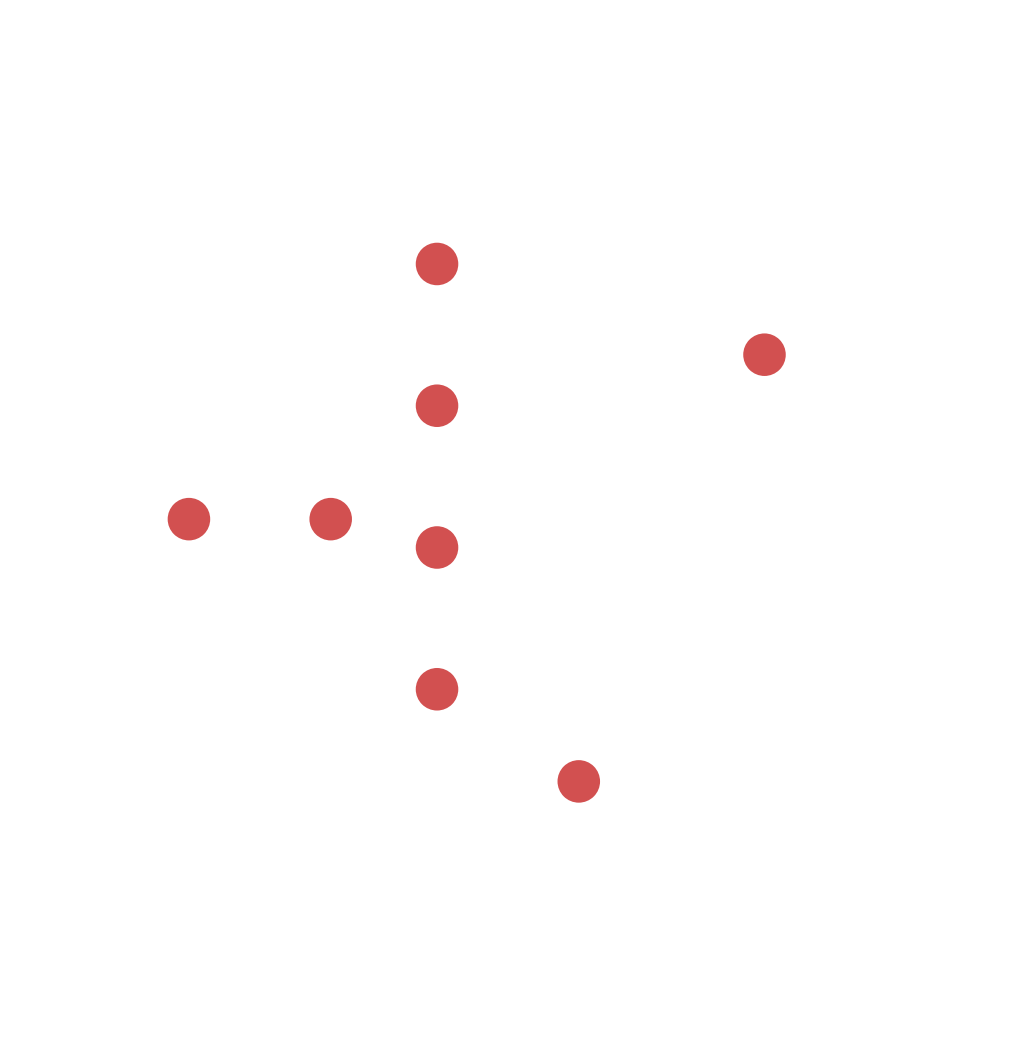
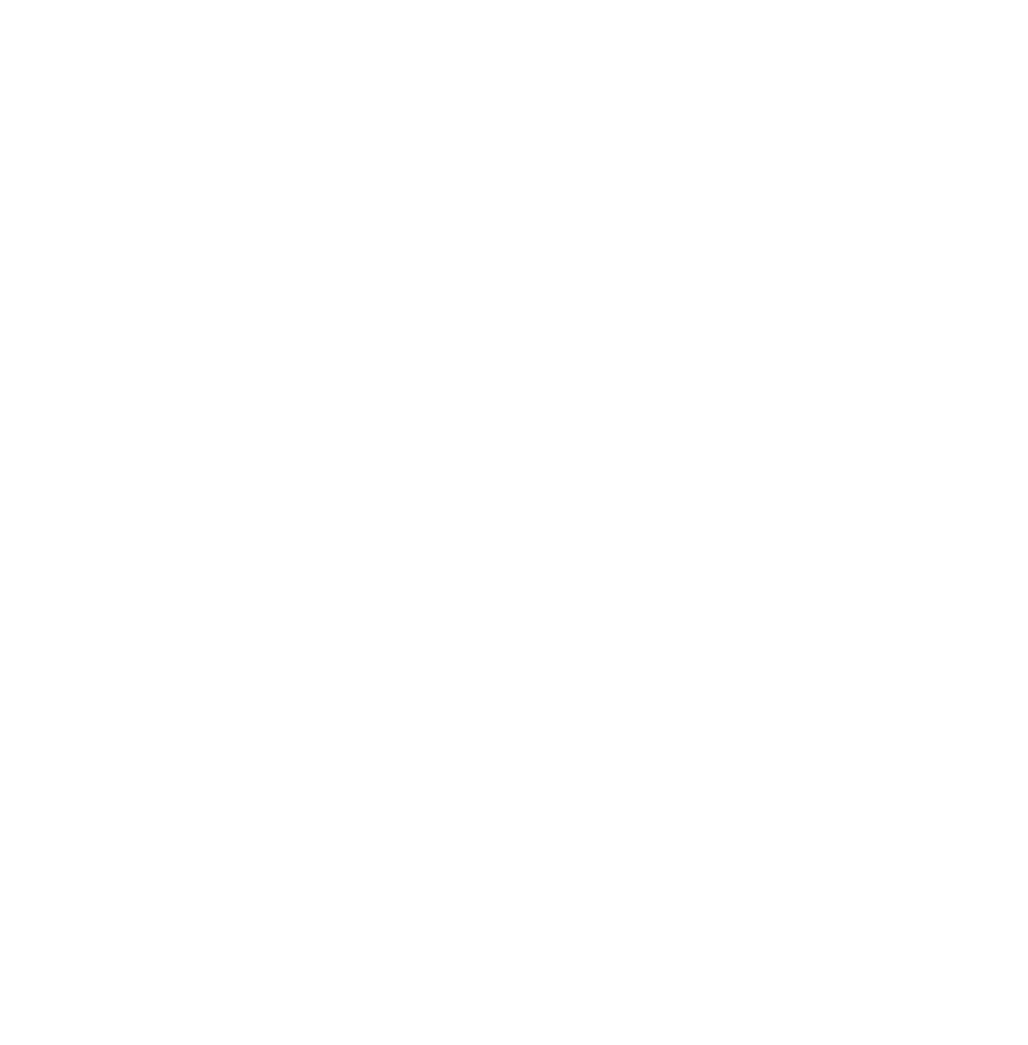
part: (437, 263) -> none
part: (764, 354) -> none
part: (437, 405) -> none
part: (188, 519) -> none
part: (330, 519) -> none
part: (437, 547) -> none
part: (437, 689) -> none
part: (578, 781) -> none

